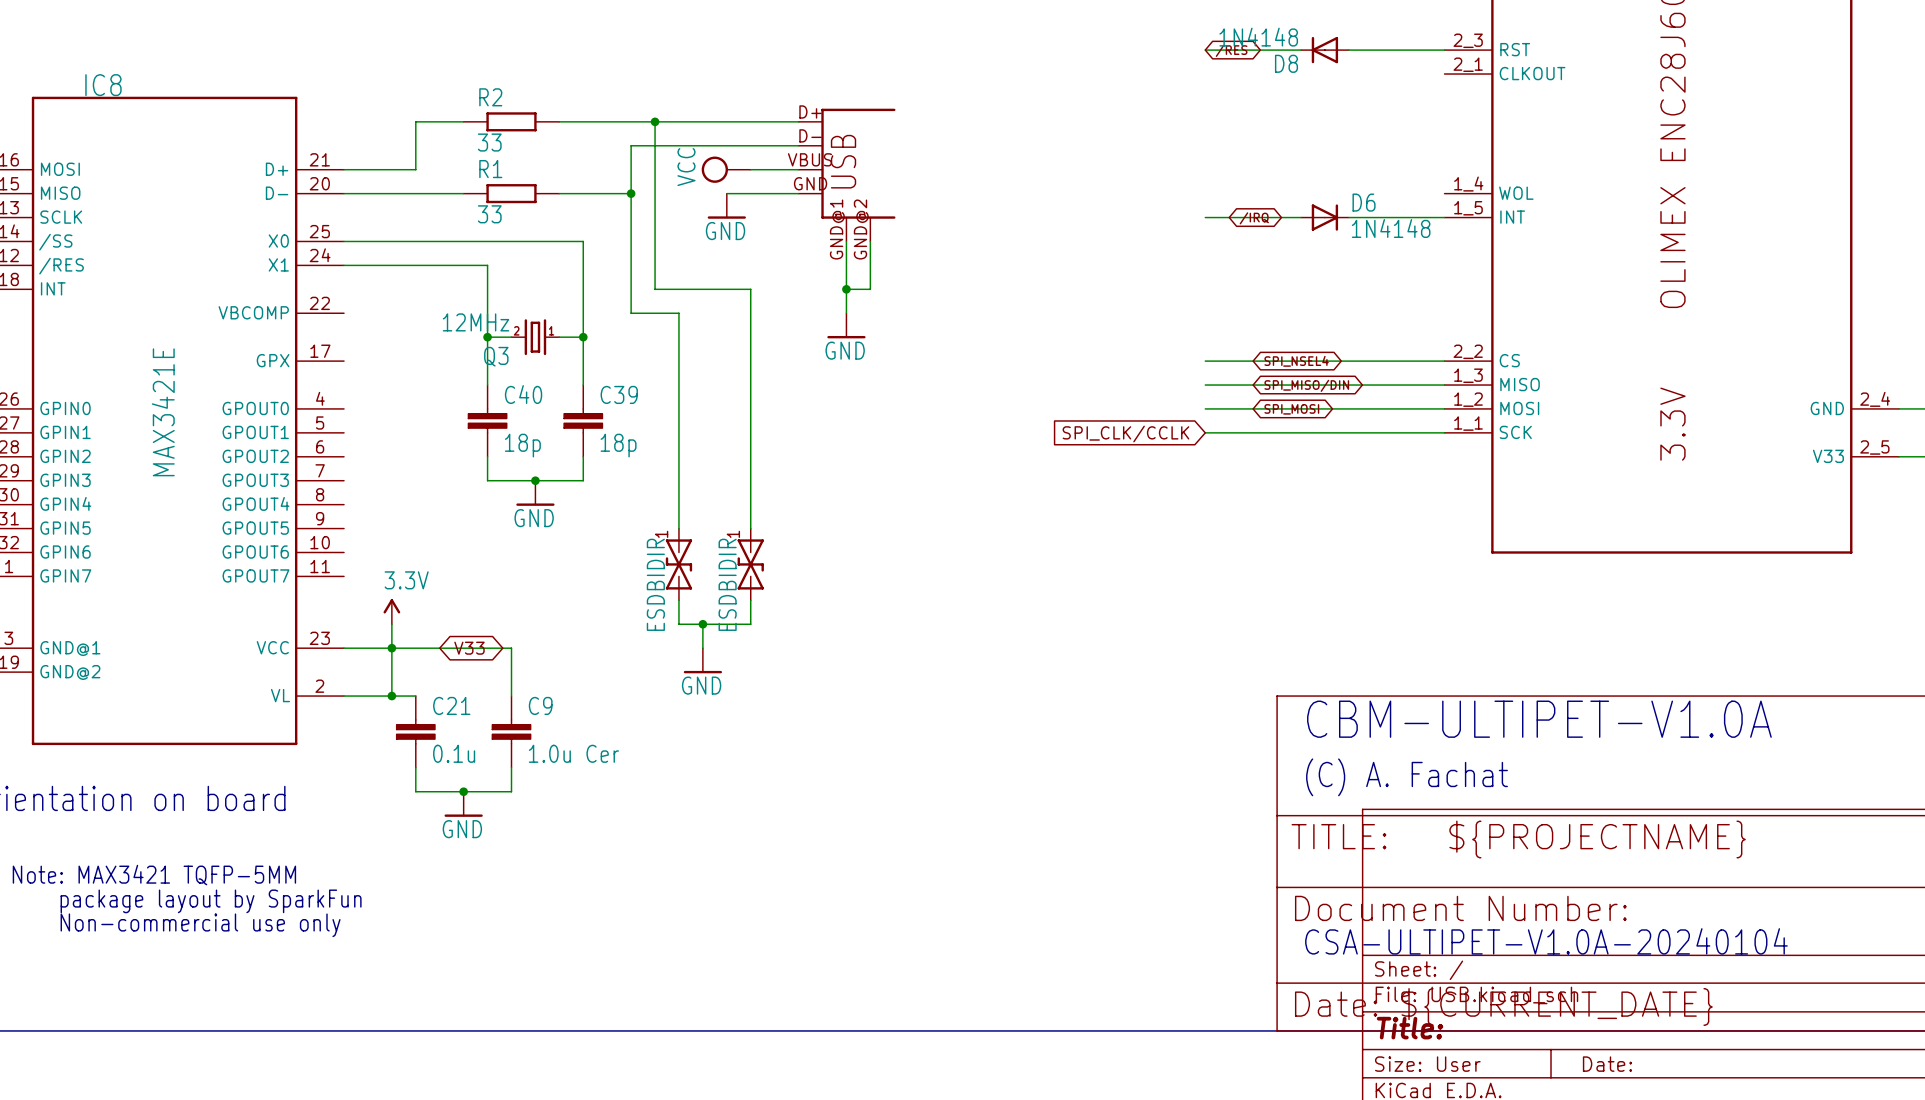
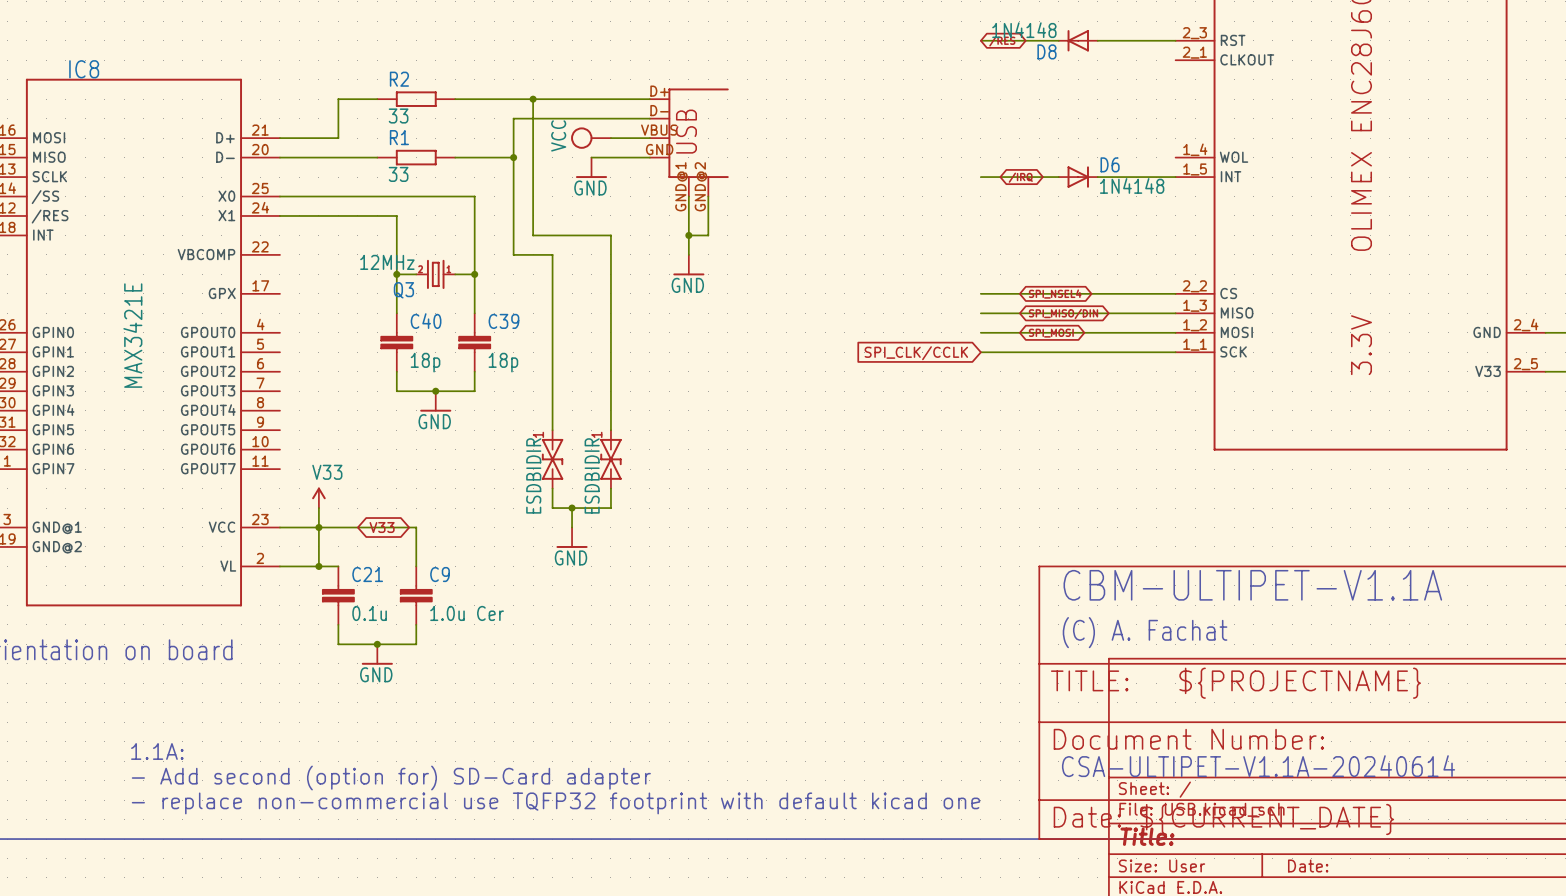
power symbol: 3.3V (391, 611) -> V33 (318, 497)
text: CBM-ULTIPET-V1.0A (1539, 719) -> CBM-ULTIPET-V1.1A (1252, 585)
text: Note: MAX3421 TQFP-5MM (154, 875) -> none
text: package layout by SparkFun (211, 901) -> none
text: none -> 1.1A: (157, 751)
text: Non-commercial use only (200, 925) -> none
text: CSA-ULTIPET-V1.0A-20240104 (1546, 941) -> CSA-ULTIPET-V1.1A-20240614 (1258, 766)
text: none -> - Add second (option for) SD-Card adapter (391, 778)
text: none -> - replace non-commercial use TQFP32 footprint with default kicad one (555, 803)

